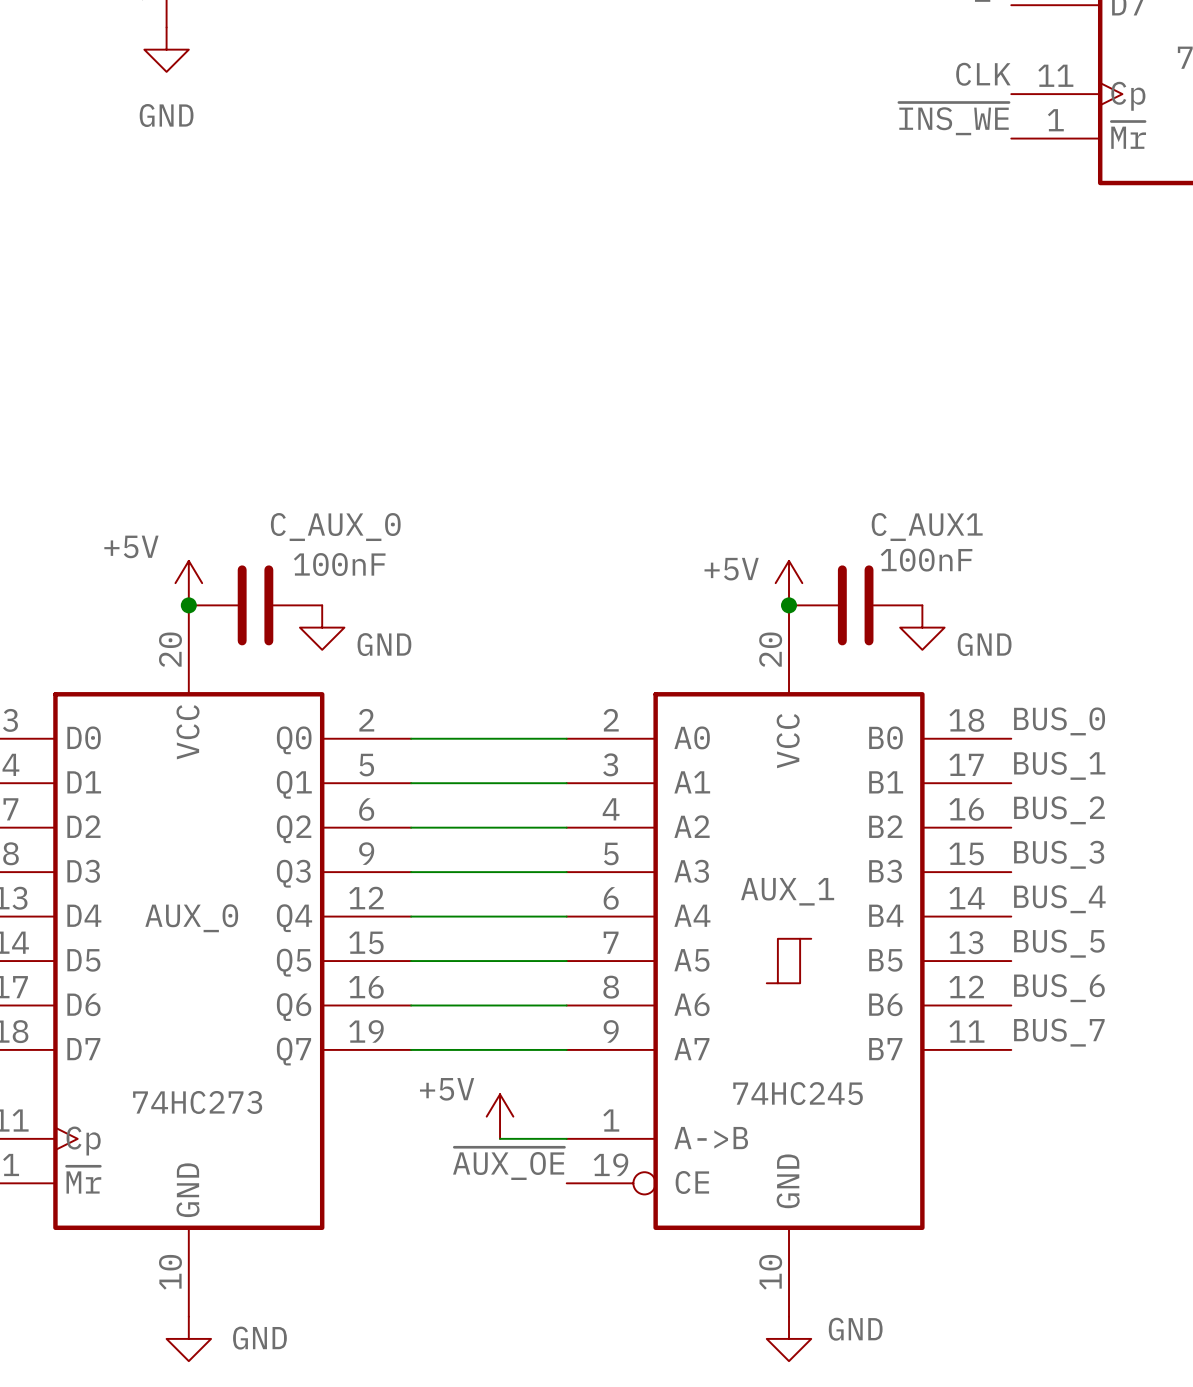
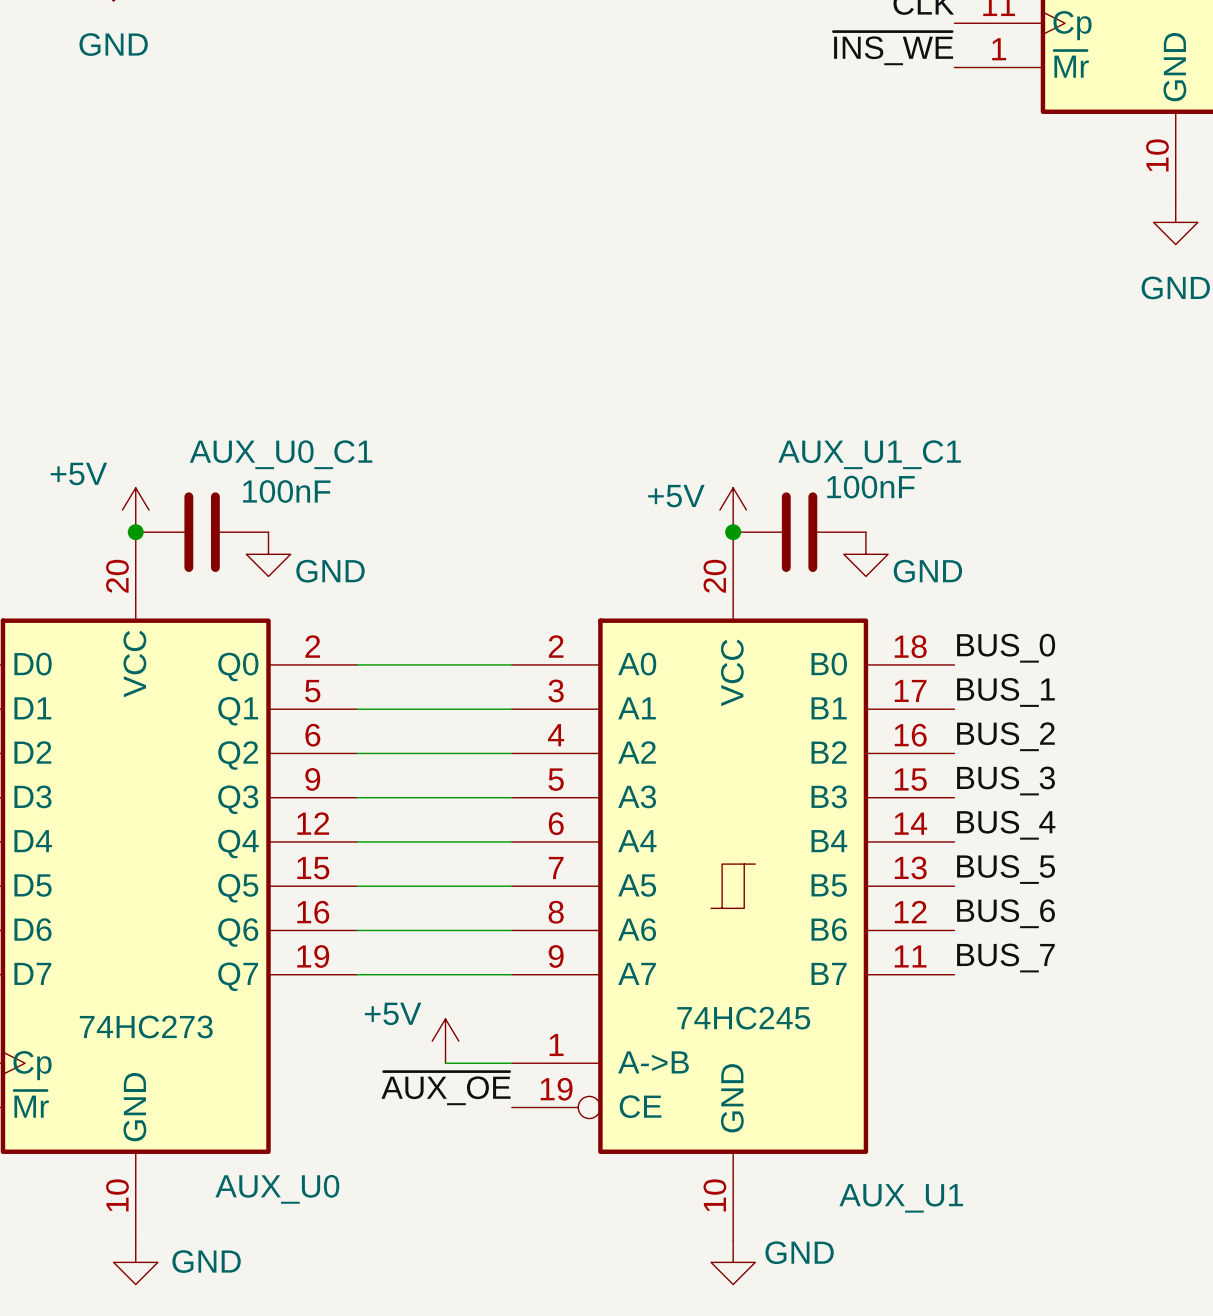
C_AUX_0 name: C_AUX_0 (335, 527) -> AUX_U0_C1 (281, 454)
C_AUX1 name: C_AUX1 (927, 527) -> AUX_U1_C1 (869, 454)
AUX_1 name: AUX_1 (787, 891) -> AUX_U1 (901, 1198)
AUX_0 name: AUX_0 (191, 918) -> AUX_U0 (277, 1189)

